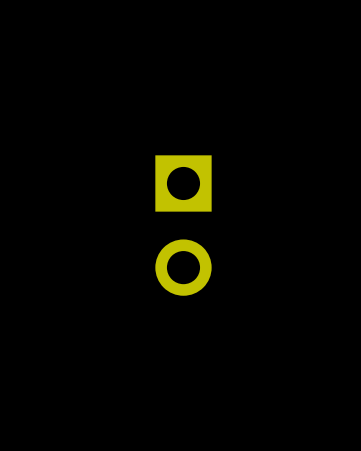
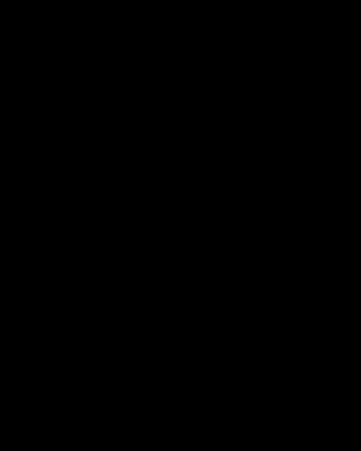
part: (183, 225) -> none

